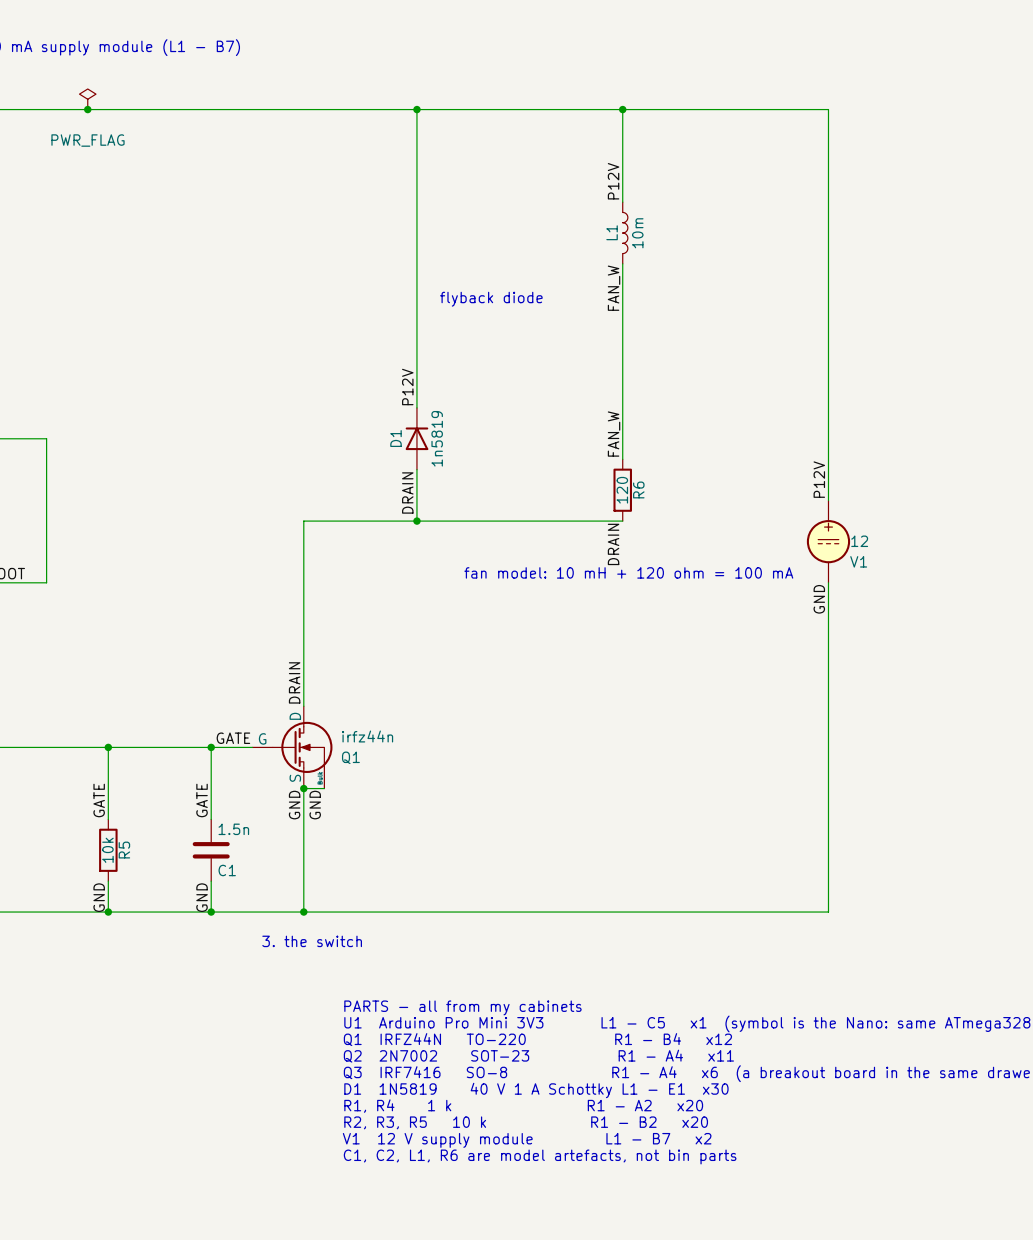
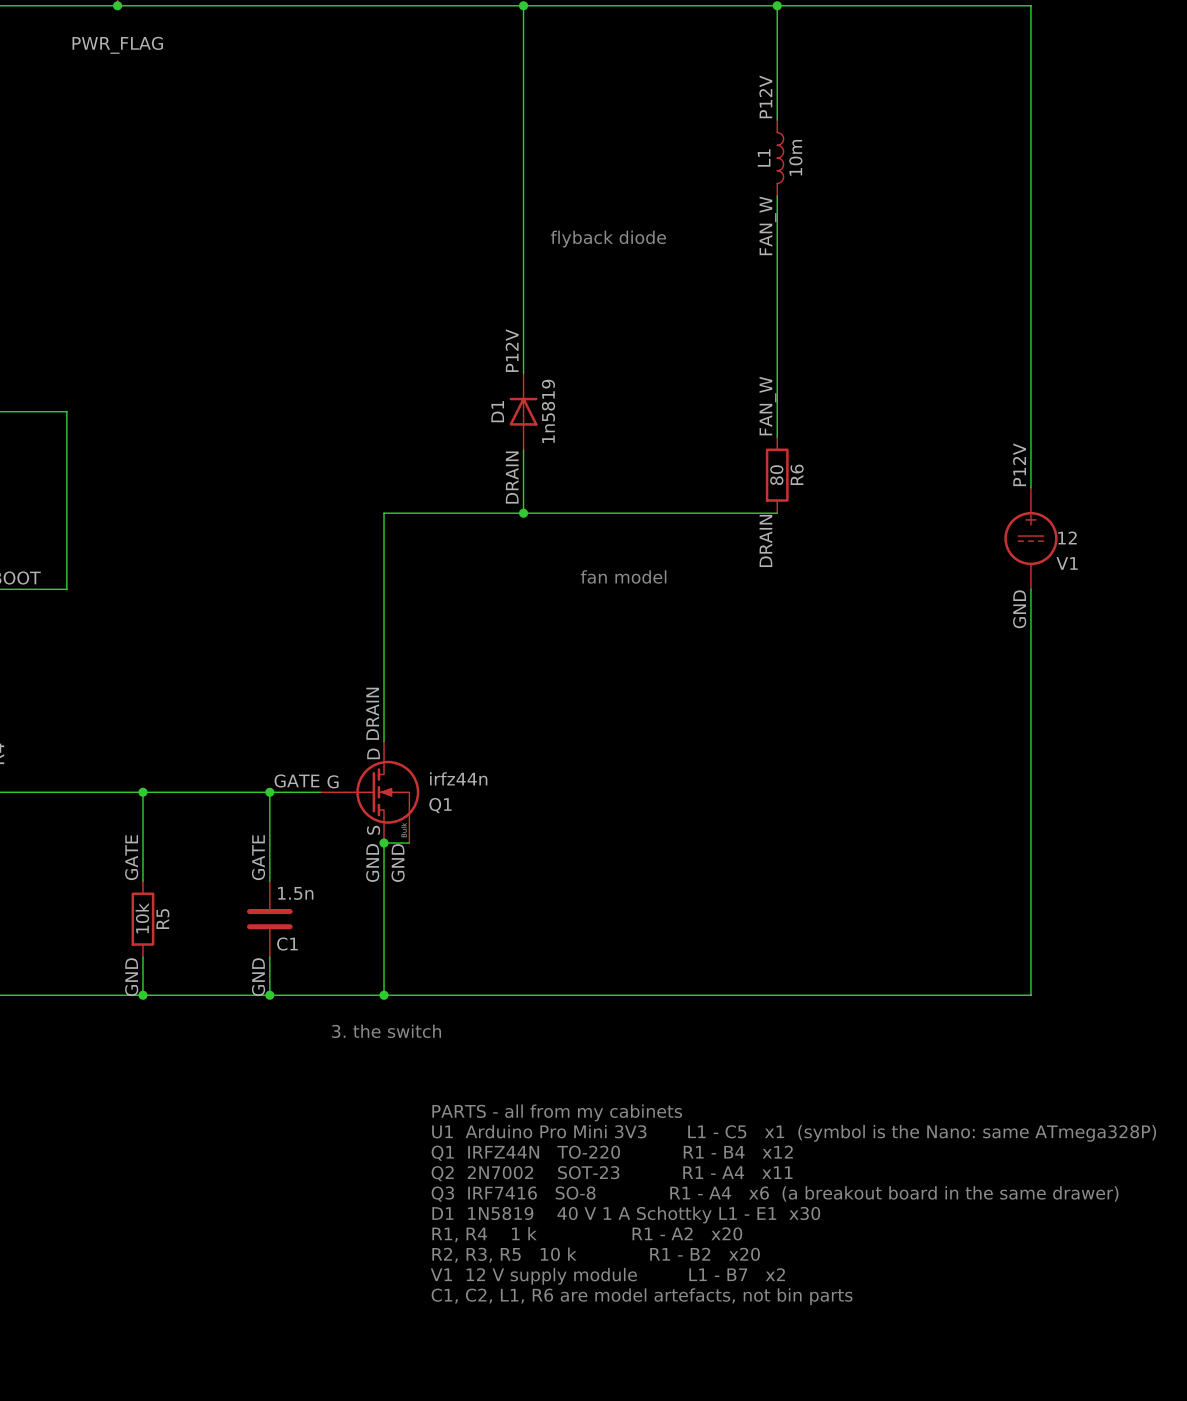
R6 value: 120 (622, 490) -> 80 (776, 475)
text: fan model: 10 mH + 120 ohm = 100 mA (628, 572) -> fan model (623, 576)

